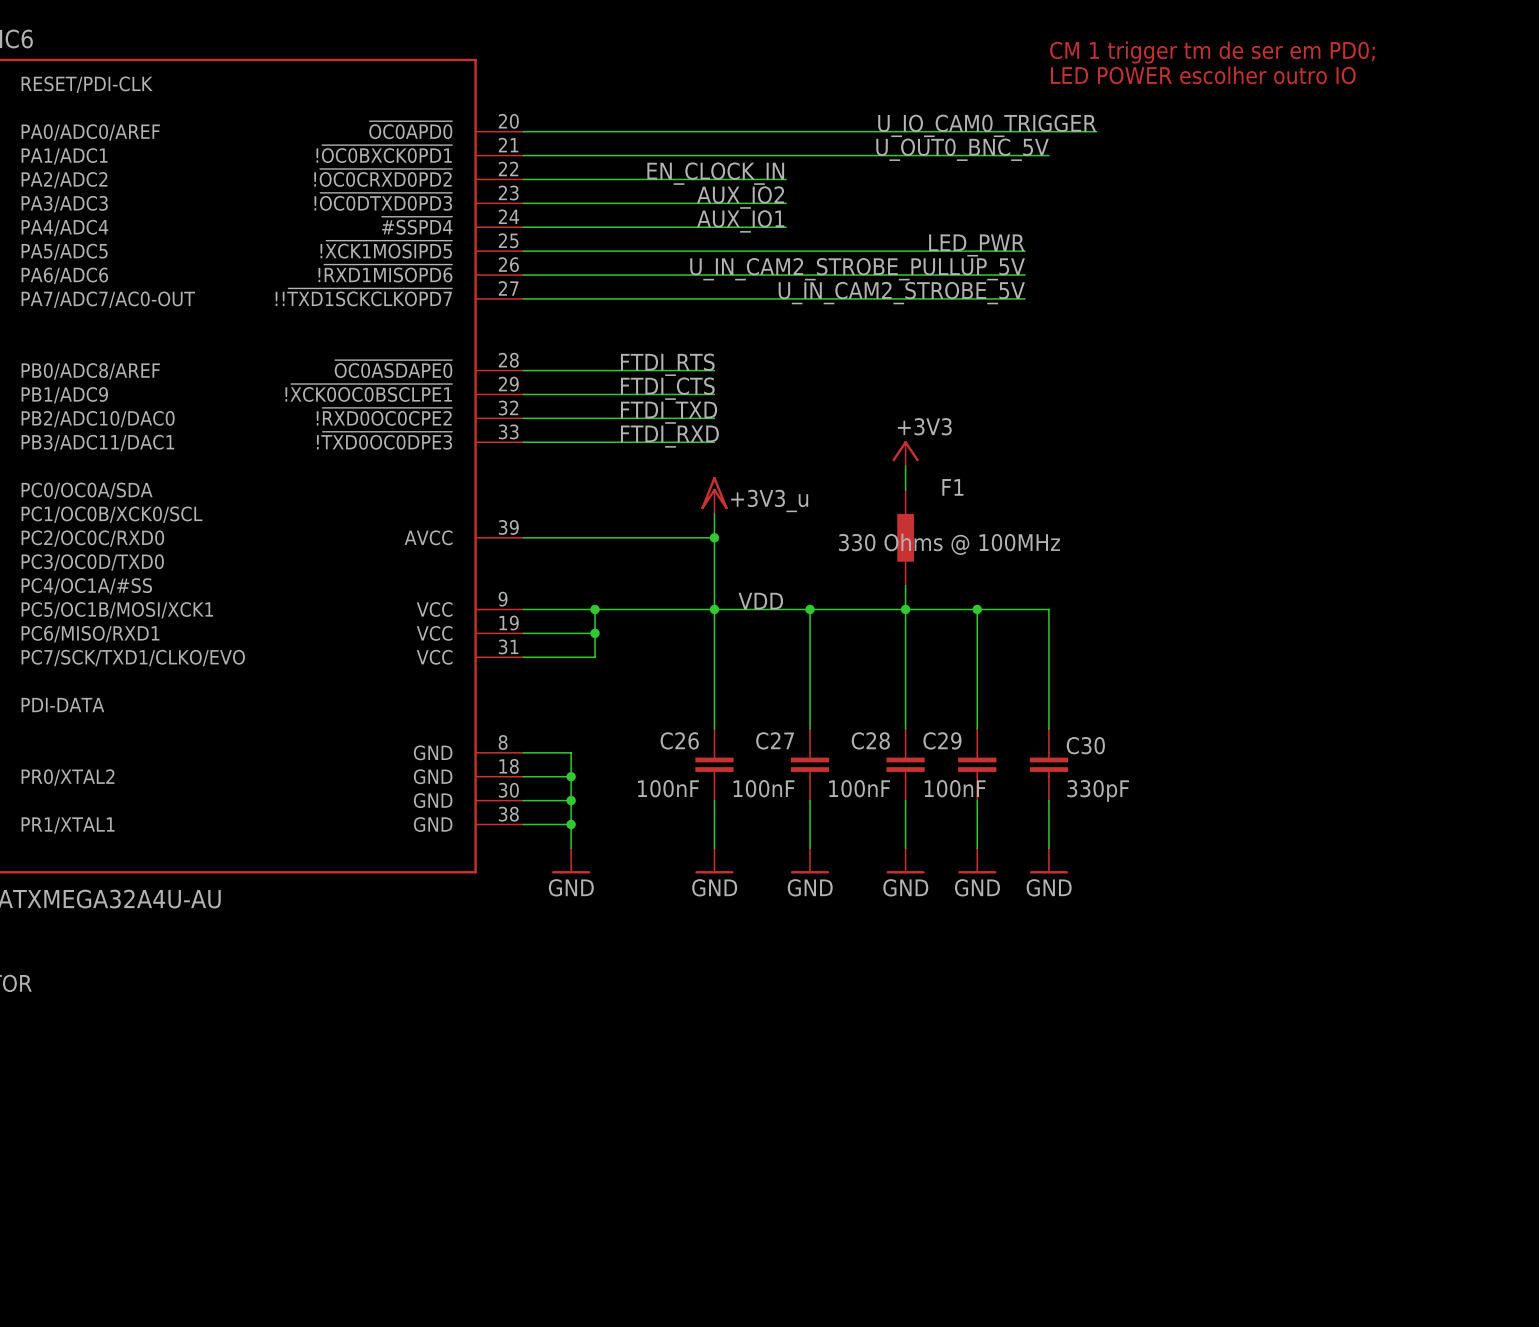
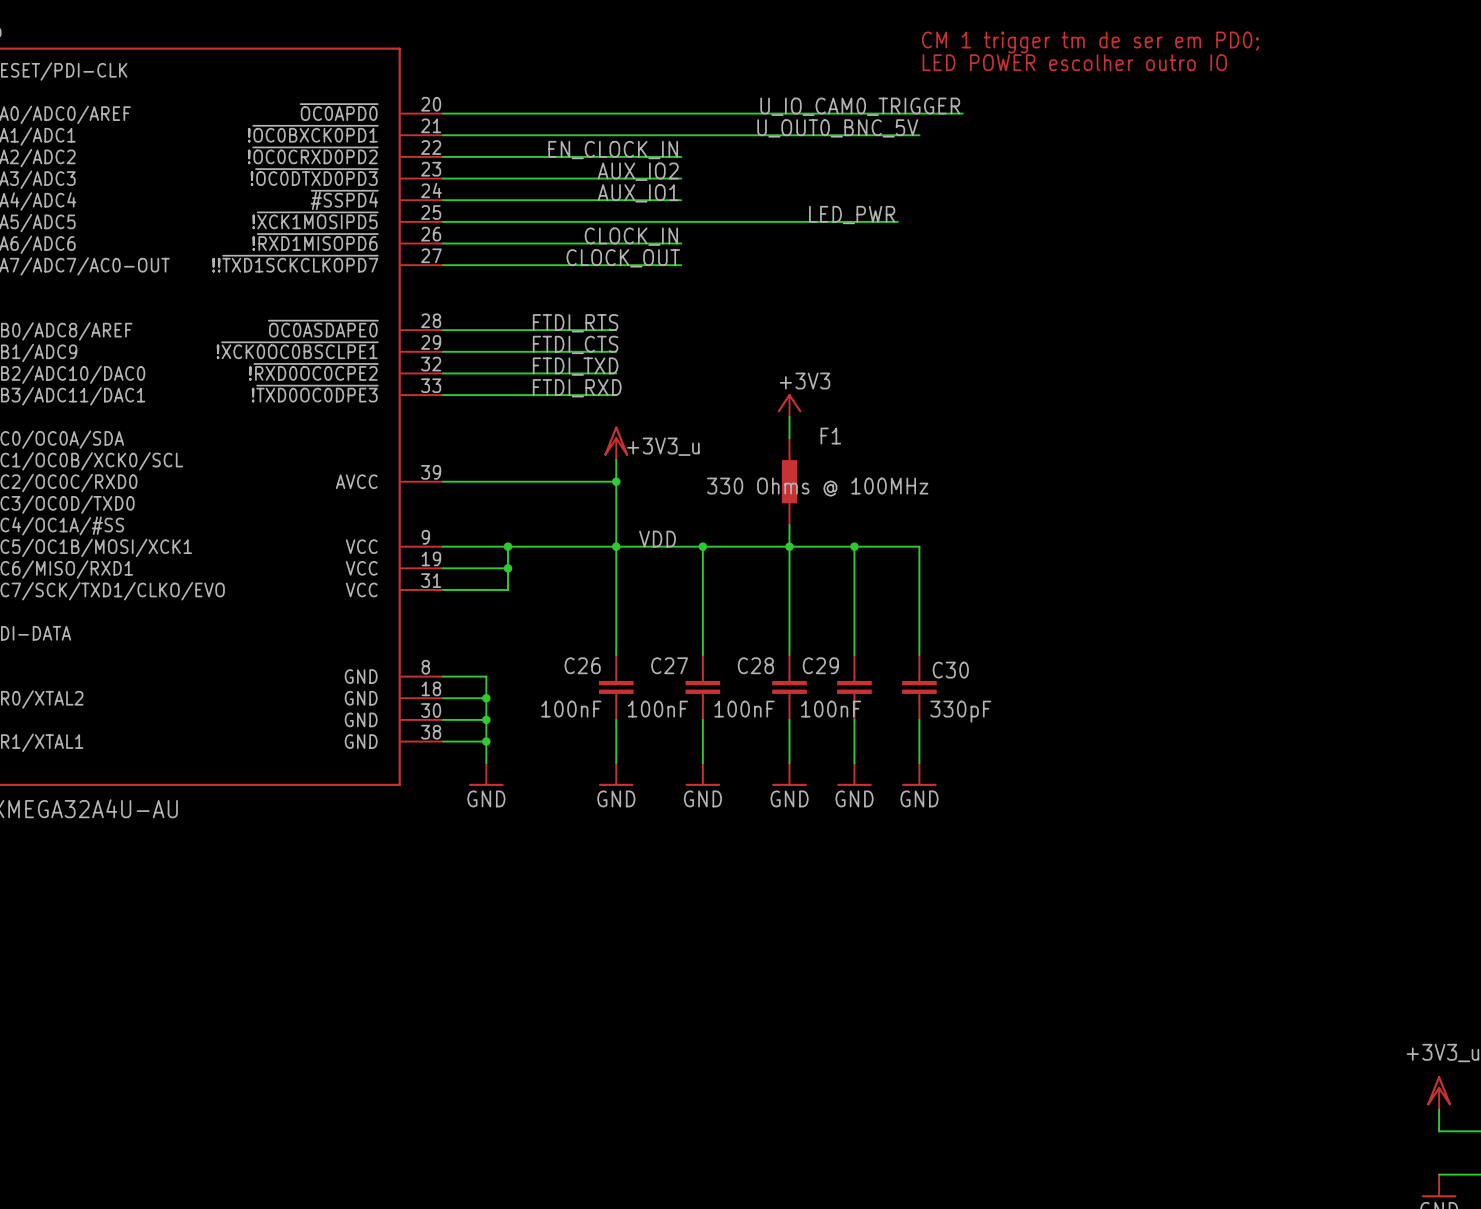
label: none -> CLOCK_IN (631, 236)
label: U_IN_CAM2_STROBE_PULLUP_5V (857, 269) -> none
wire: (786, 275) (1025, 275) -> none
label: none -> CLOCK_OUT (623, 258)
label: U_IN_CAM2_STROBE_5V (901, 293) -> none
wire: (786, 298) (1025, 298) -> none

